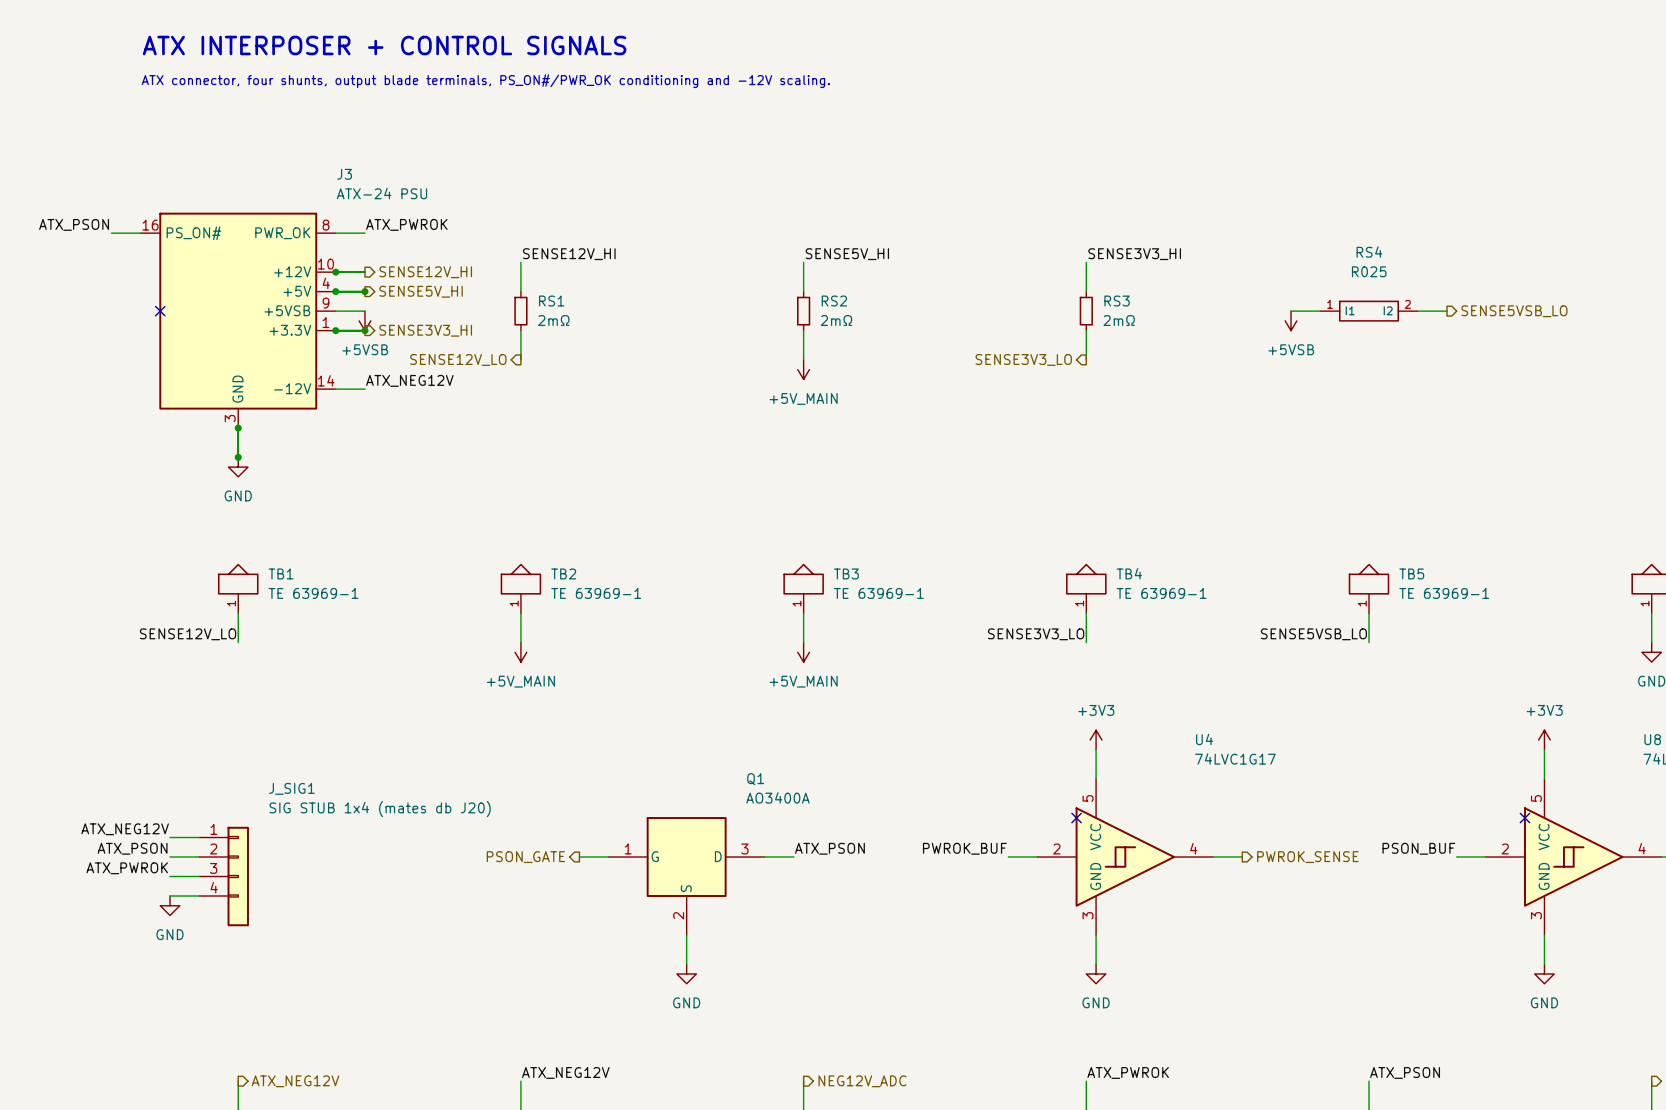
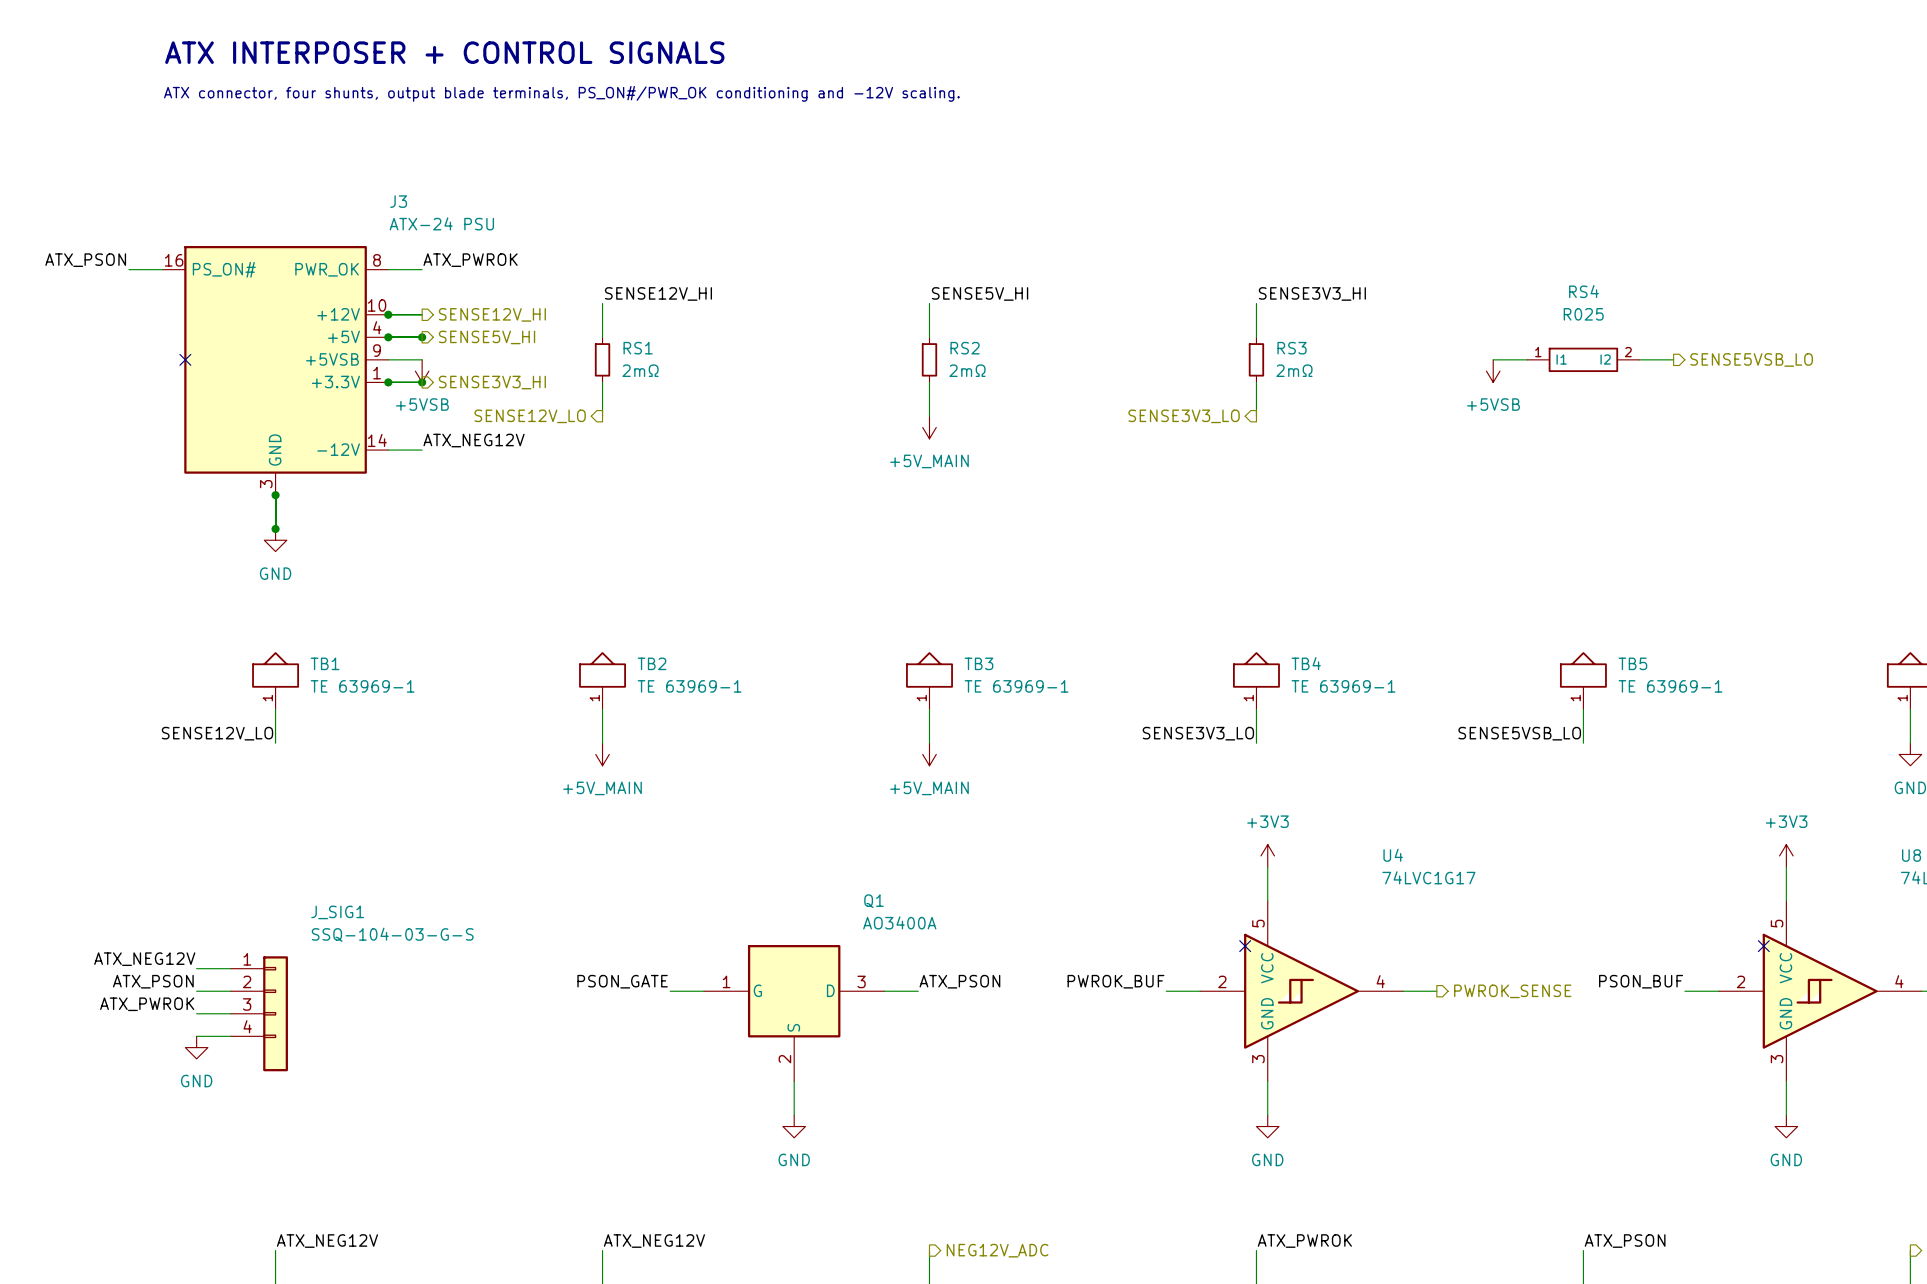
J_SIG1 value: SIG STUB 1x4 (mates db J20) (380, 809) -> SSQ-104-03-G-S (392, 934)
label: none -> PSON_GATE (622, 981)
hierarchical label: PSON_GATE (525, 857) -> none
label: none -> ATX_NEG12V (327, 1241)
hierarchical label: ATX_NEG12V (295, 1081) -> none

